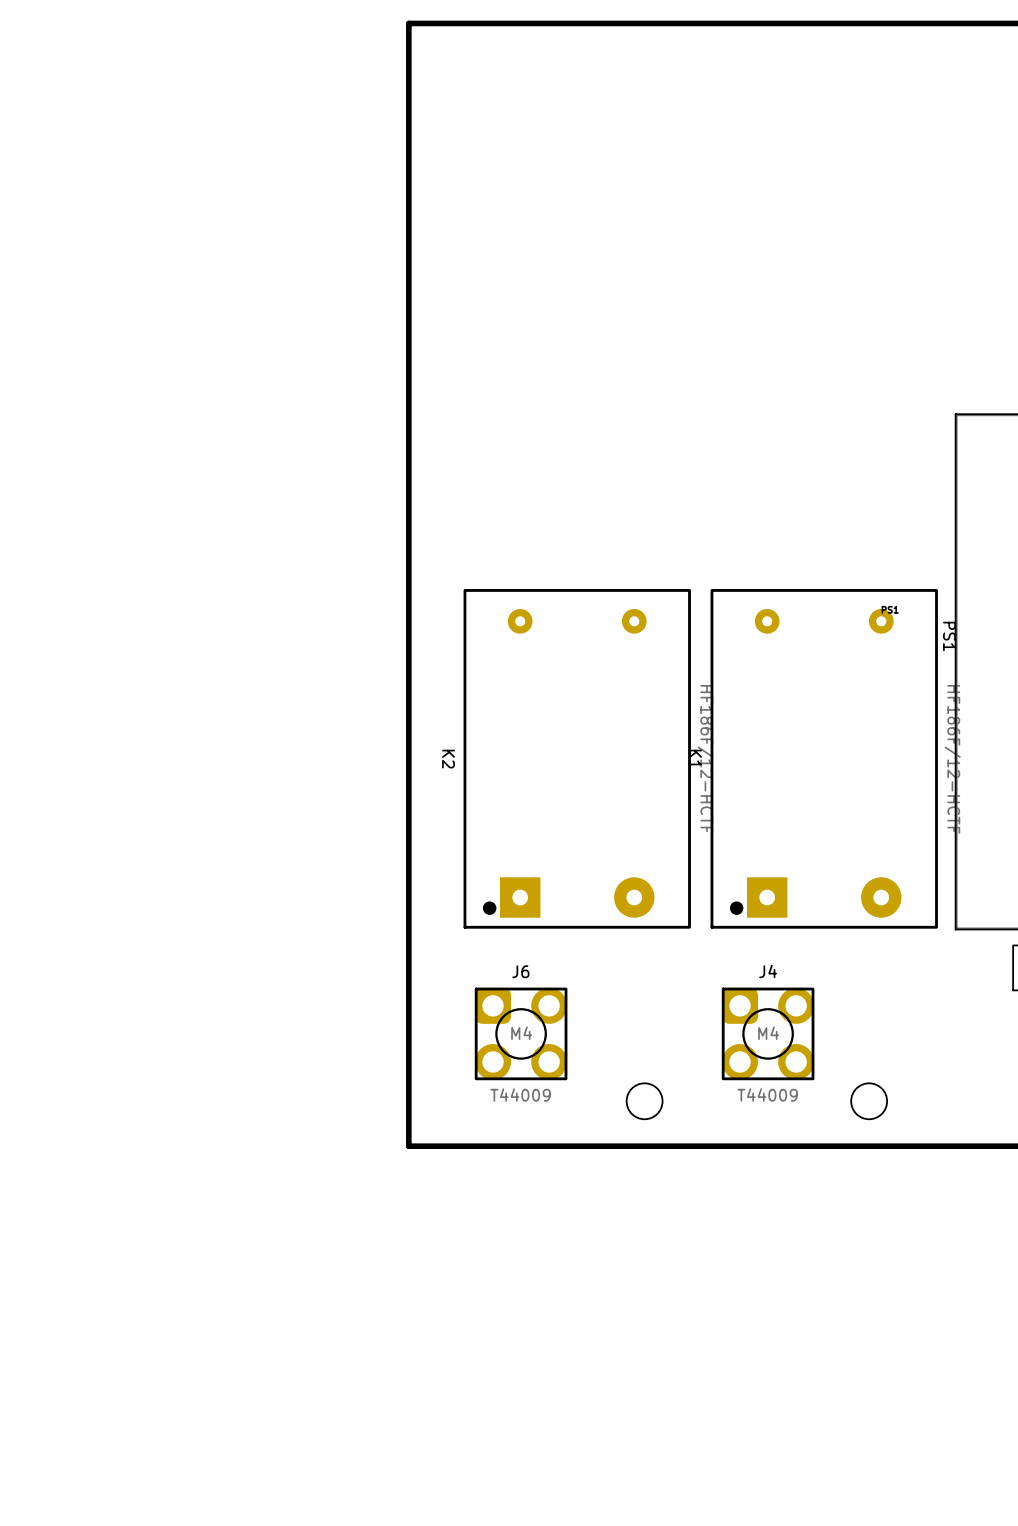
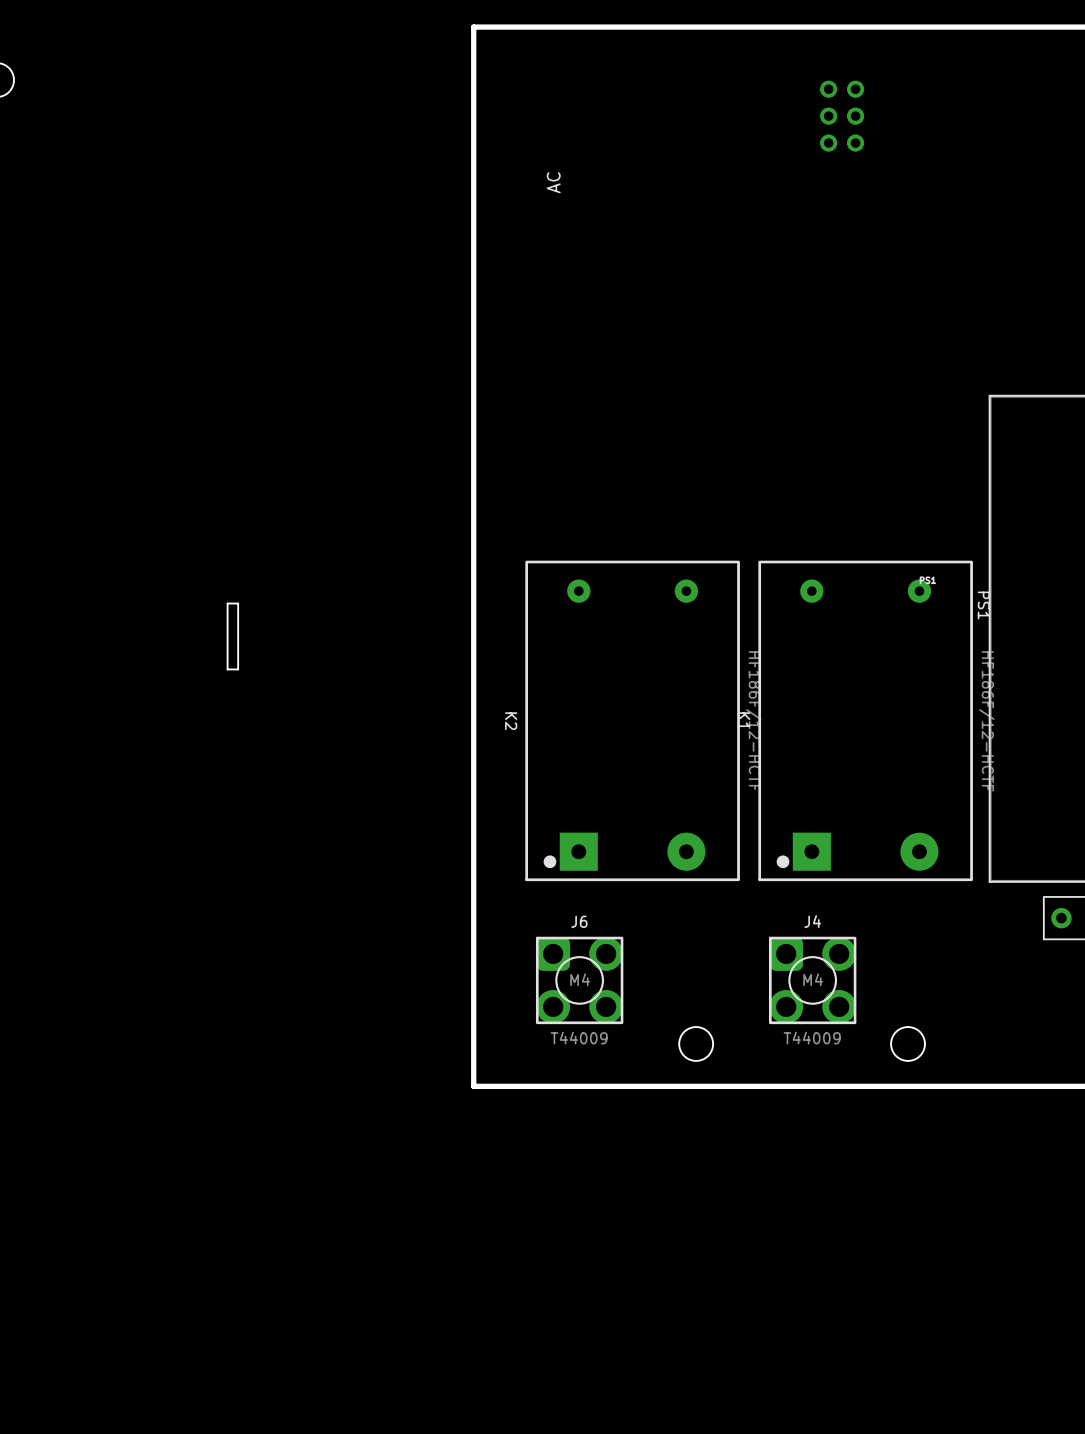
part: none -> (842, 116)
text: none -> AC (553, 182)
board edge: none -> (238, 603) (227, 603) (227, 669) (238, 669) (238, 603)

